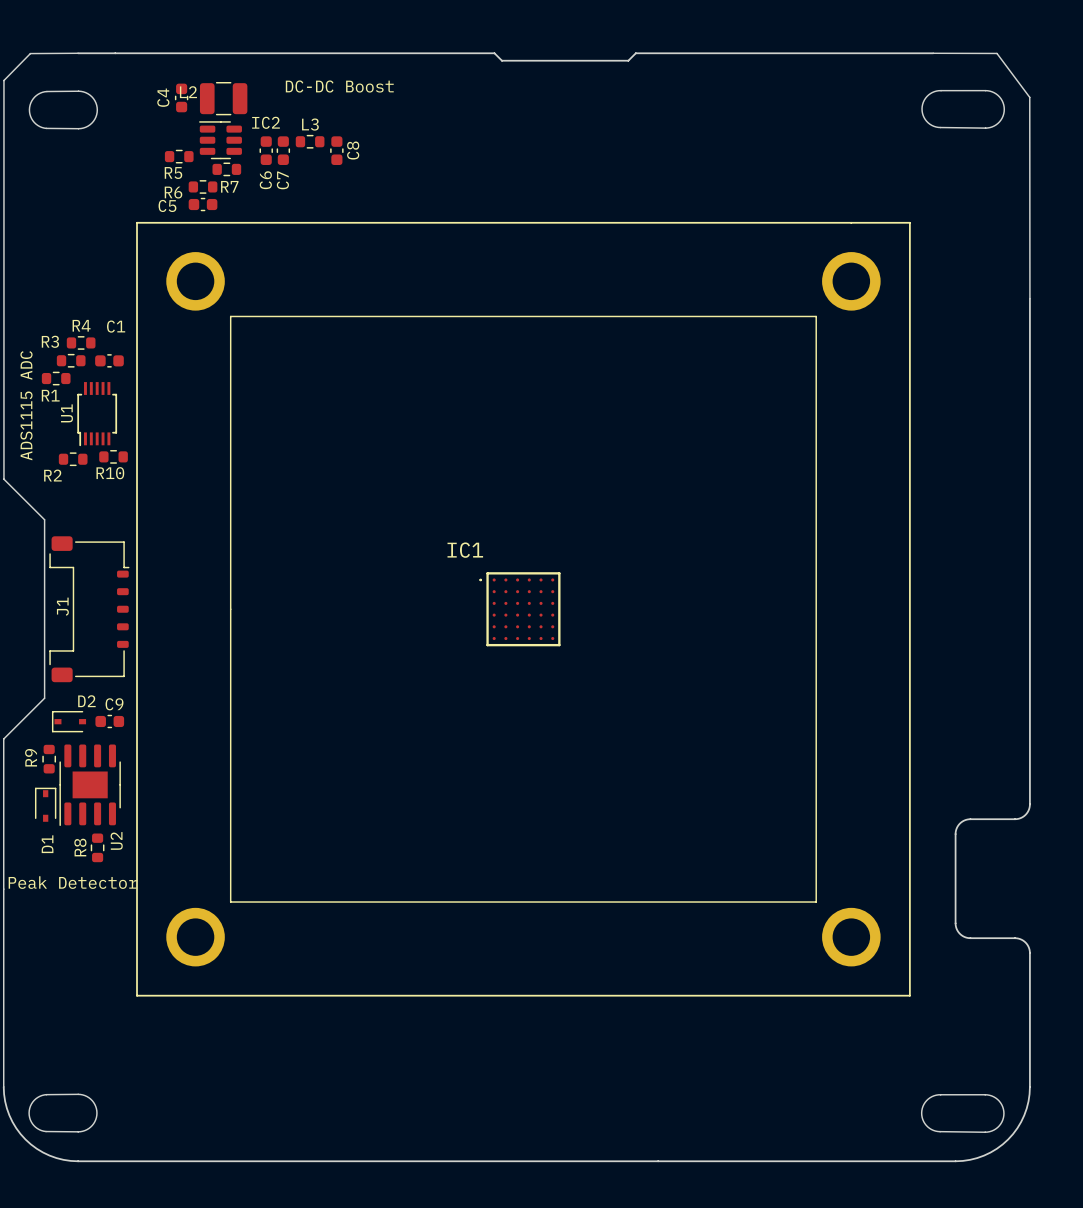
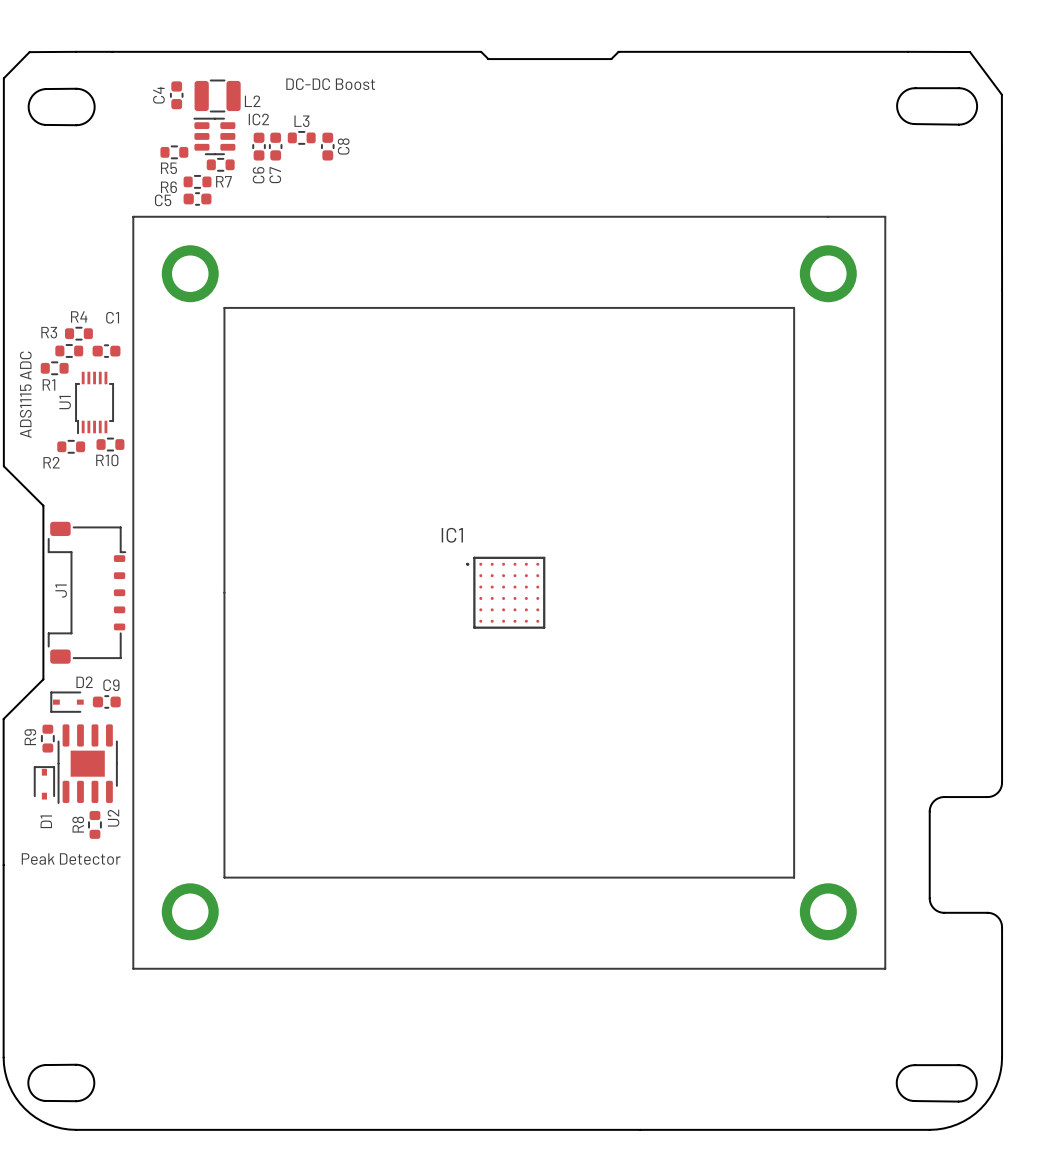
L2 name position: L2 (188, 92) -> L2 (252, 101)

